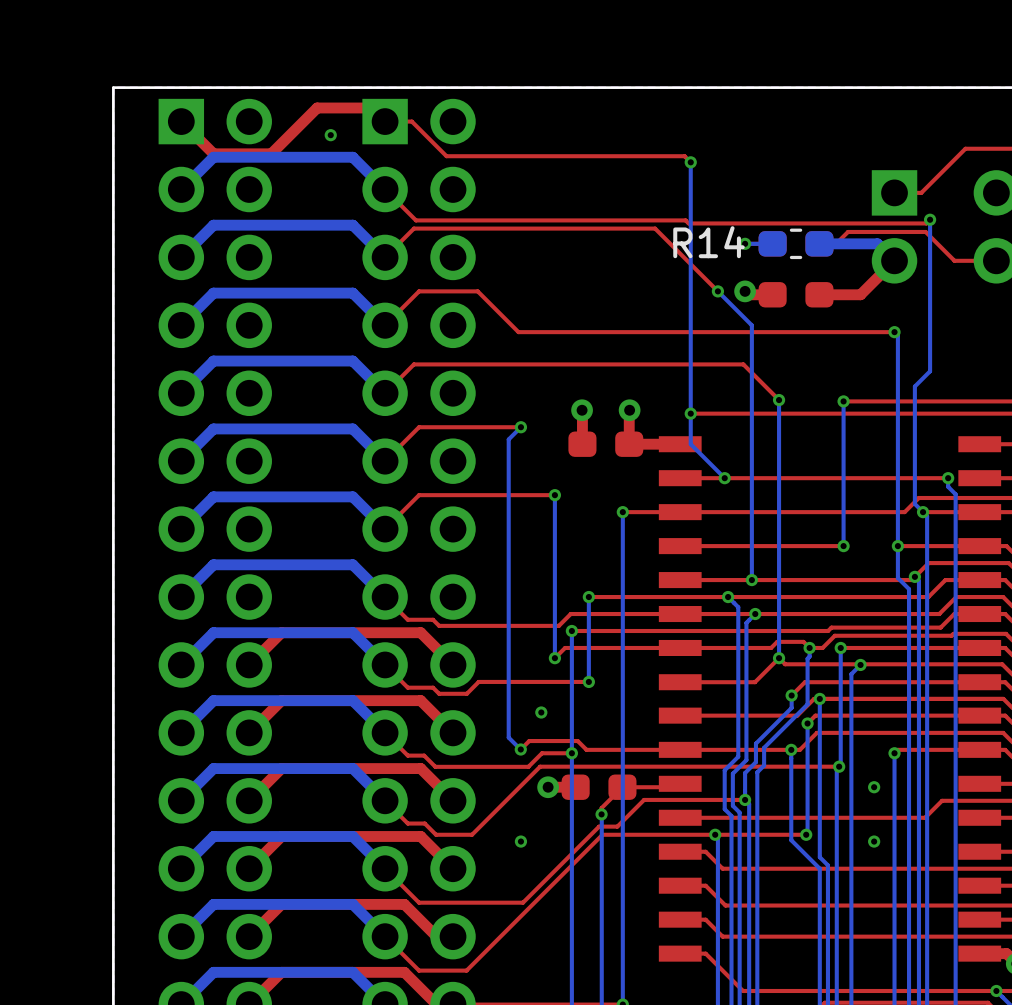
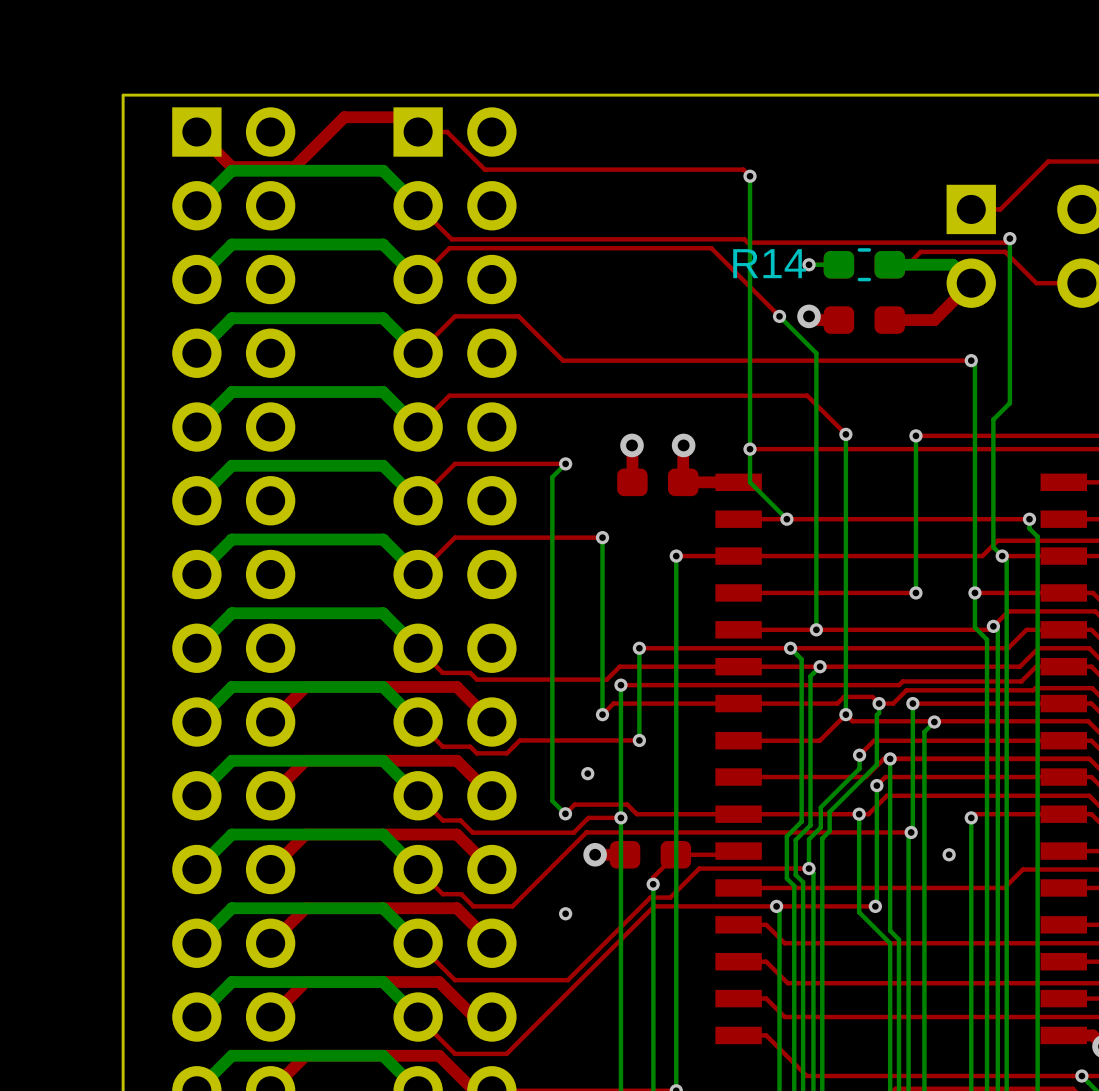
via: (330, 135) -> none
via: (874, 841) -> none

